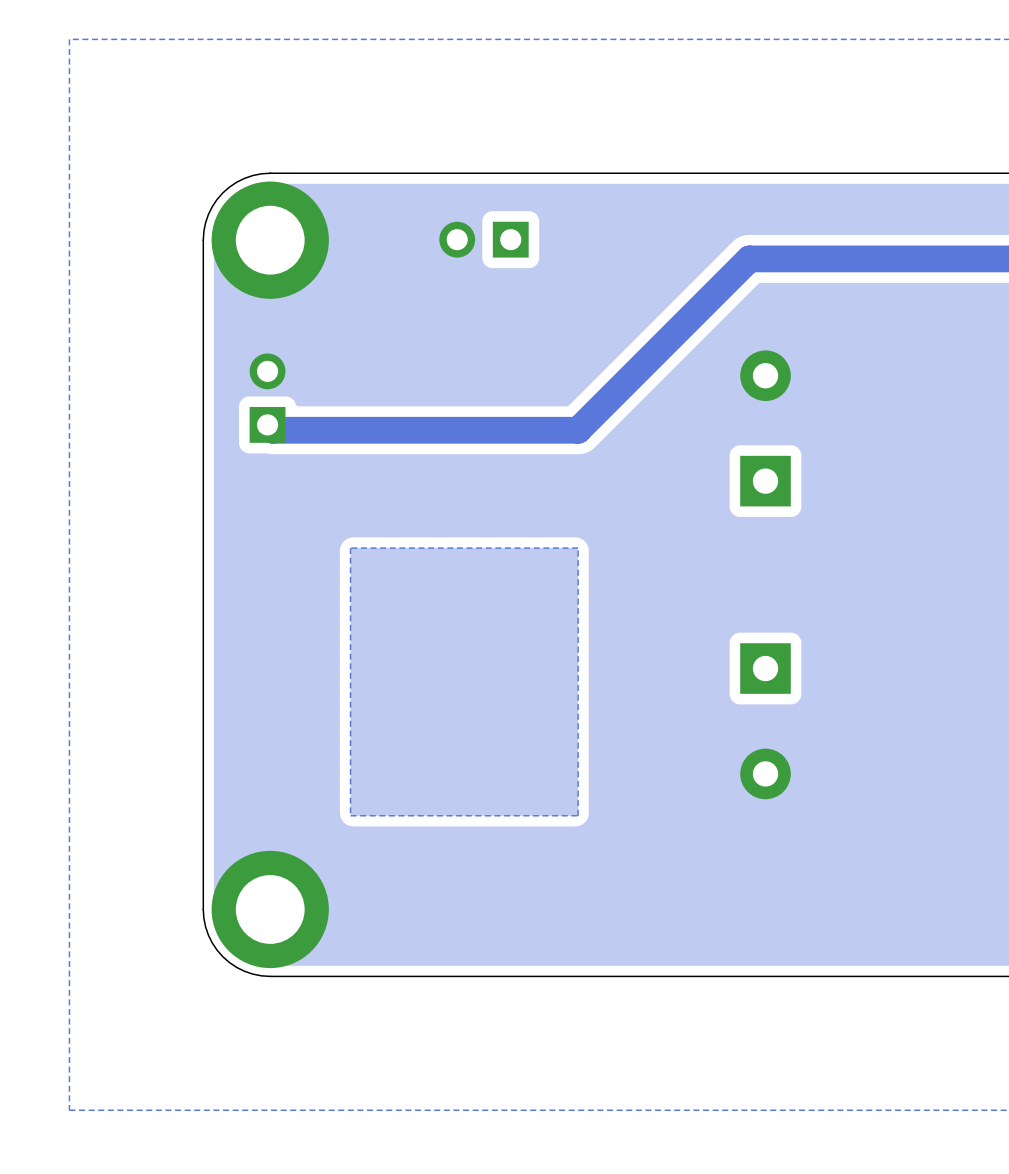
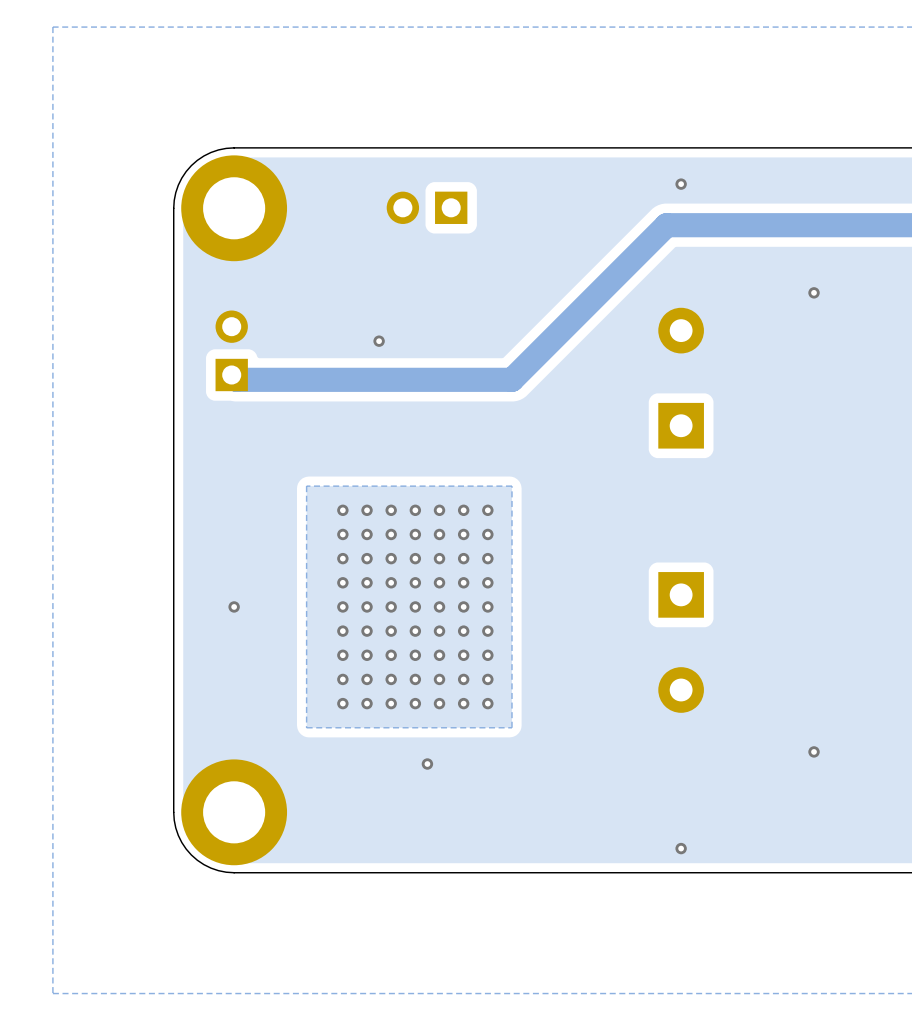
via: none -> (681, 184)
via: none -> (814, 292)
via: none -> (379, 341)
via: none -> (342, 510)
via: none -> (367, 510)
via: none -> (391, 510)
via: none -> (415, 510)
via: none -> (439, 510)
via: none -> (463, 510)
via: none -> (487, 510)
via: none -> (342, 534)
via: none -> (367, 534)
via: none -> (391, 534)
via: none -> (415, 534)
via: none -> (439, 534)
via: none -> (463, 534)
via: none -> (487, 534)
via: none -> (342, 558)
via: none -> (367, 558)
via: none -> (391, 558)
via: none -> (415, 558)
via: none -> (439, 558)
via: none -> (463, 558)
via: none -> (487, 558)
via: none -> (342, 582)
via: none -> (367, 582)
via: none -> (391, 582)
via: none -> (415, 582)
via: none -> (439, 582)
via: none -> (463, 582)
via: none -> (487, 582)
via: none -> (234, 606)
via: none -> (342, 606)
via: none -> (367, 606)
via: none -> (391, 606)
via: none -> (415, 606)
via: none -> (439, 606)
via: none -> (463, 606)
via: none -> (487, 606)
via: none -> (342, 631)
via: none -> (367, 631)
via: none -> (391, 631)
via: none -> (415, 631)
via: none -> (439, 631)
via: none -> (463, 631)
via: none -> (487, 631)
via: none -> (342, 655)
via: none -> (367, 655)
via: none -> (391, 655)
via: none -> (415, 655)
via: none -> (439, 655)
via: none -> (463, 655)
via: none -> (487, 655)
via: none -> (342, 679)
via: none -> (367, 679)
via: none -> (391, 679)
via: none -> (415, 679)
via: none -> (439, 679)
via: none -> (463, 679)
via: none -> (487, 679)
via: none -> (342, 703)
via: none -> (367, 703)
via: none -> (391, 703)
via: none -> (415, 703)
via: none -> (439, 703)
via: none -> (463, 703)
via: none -> (487, 703)
via: none -> (814, 751)
via: none -> (427, 764)
via: none -> (681, 848)

